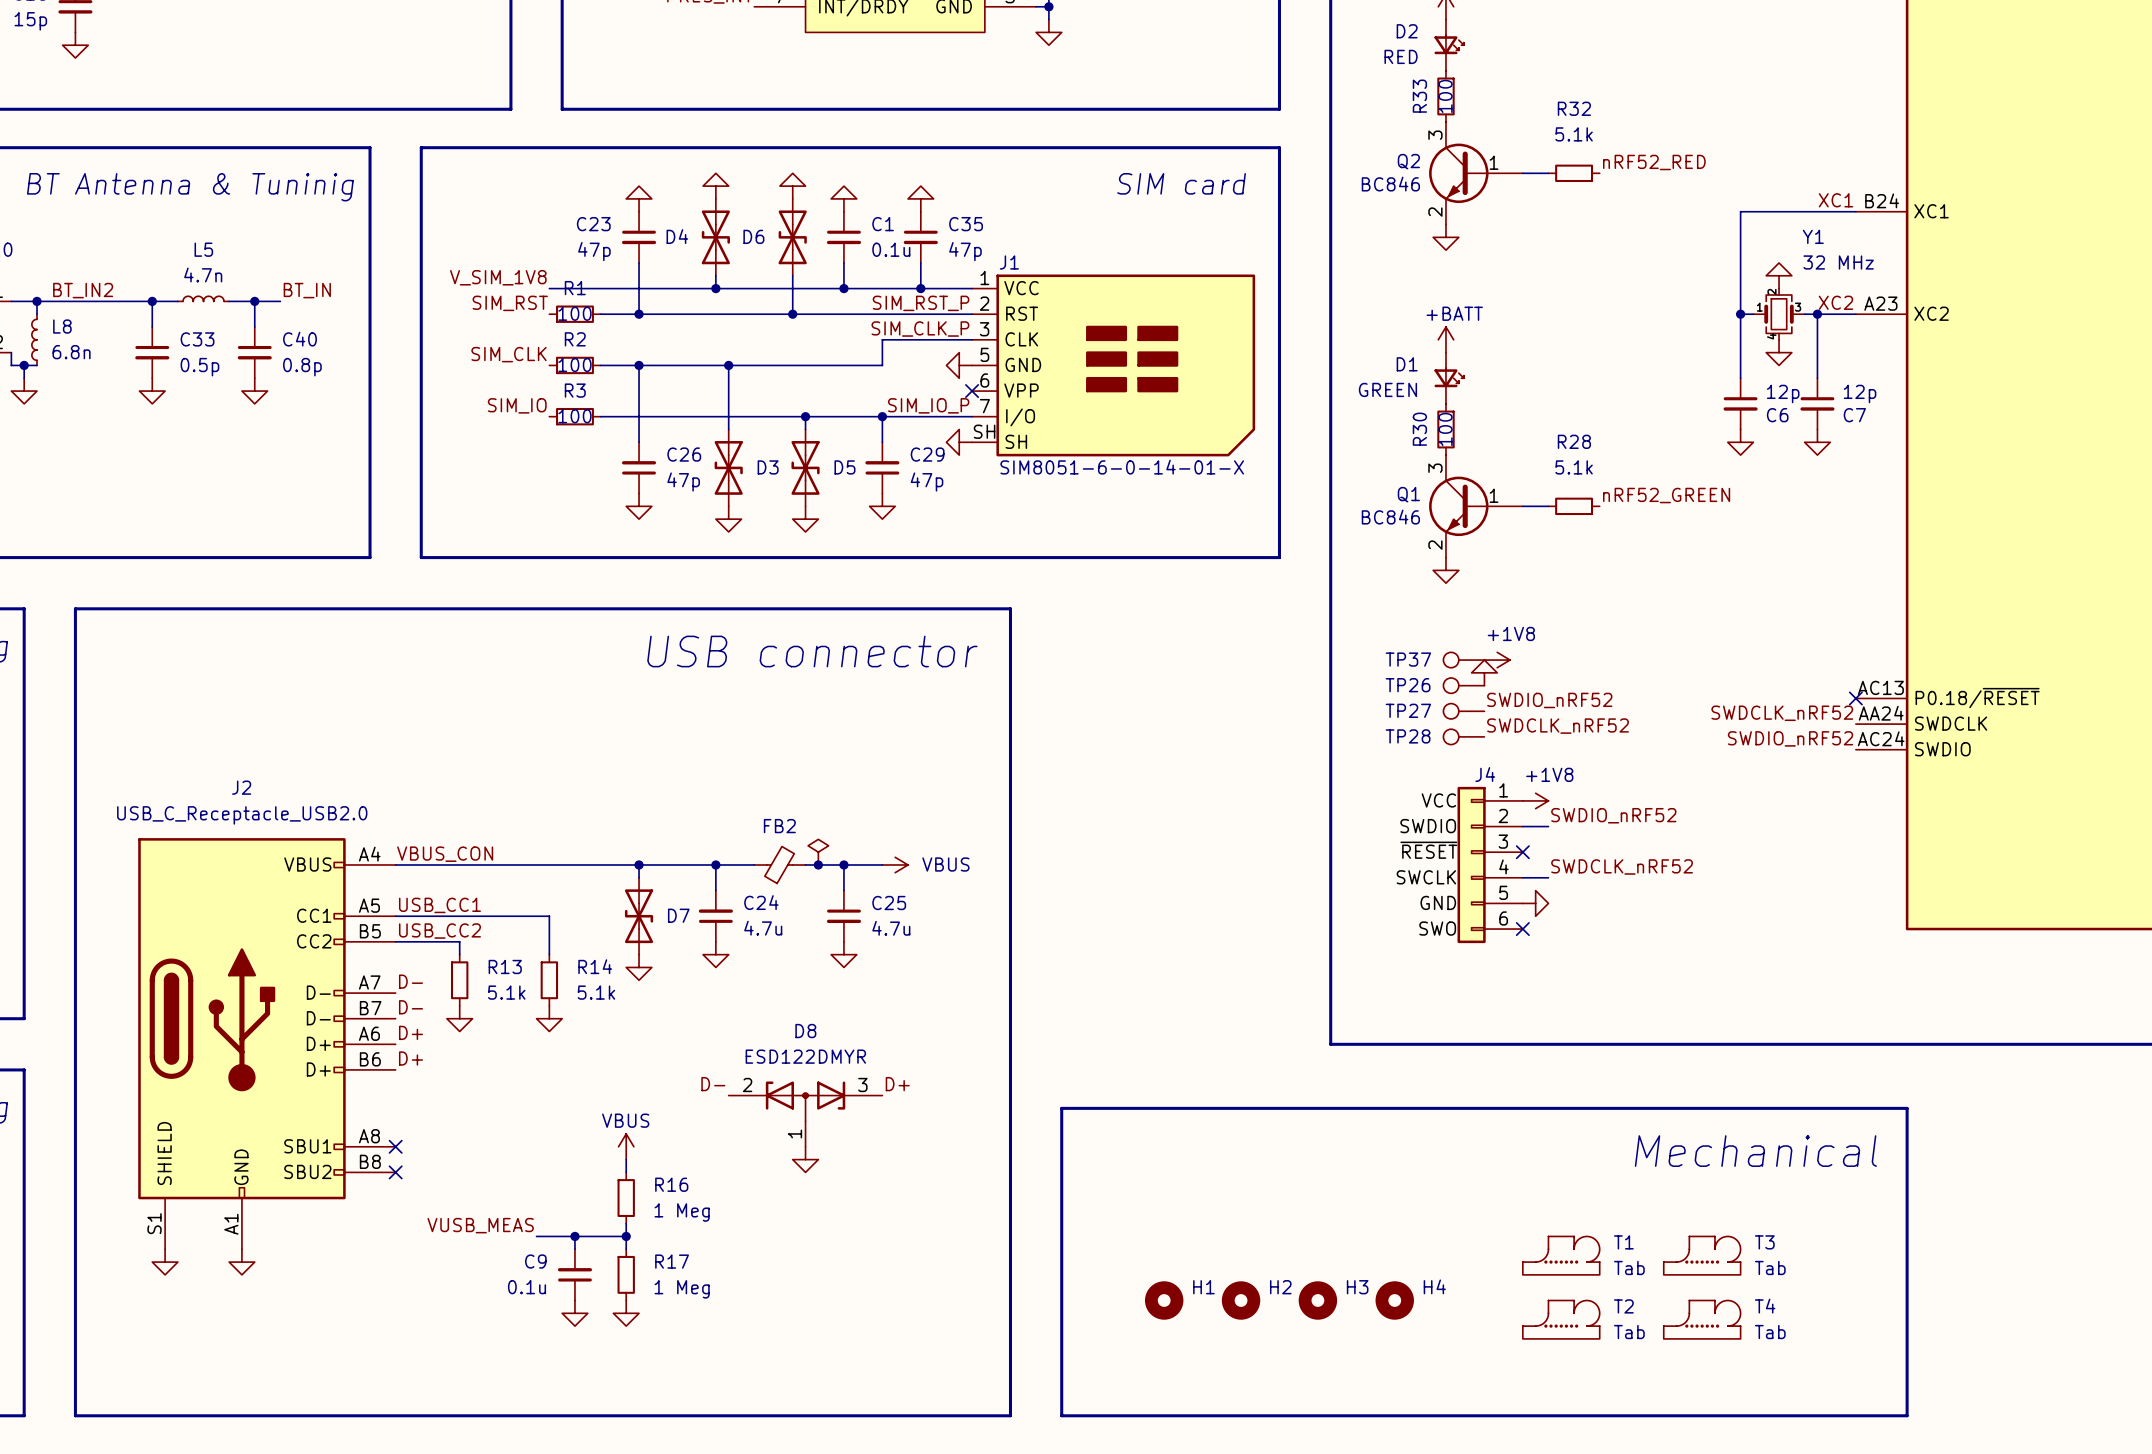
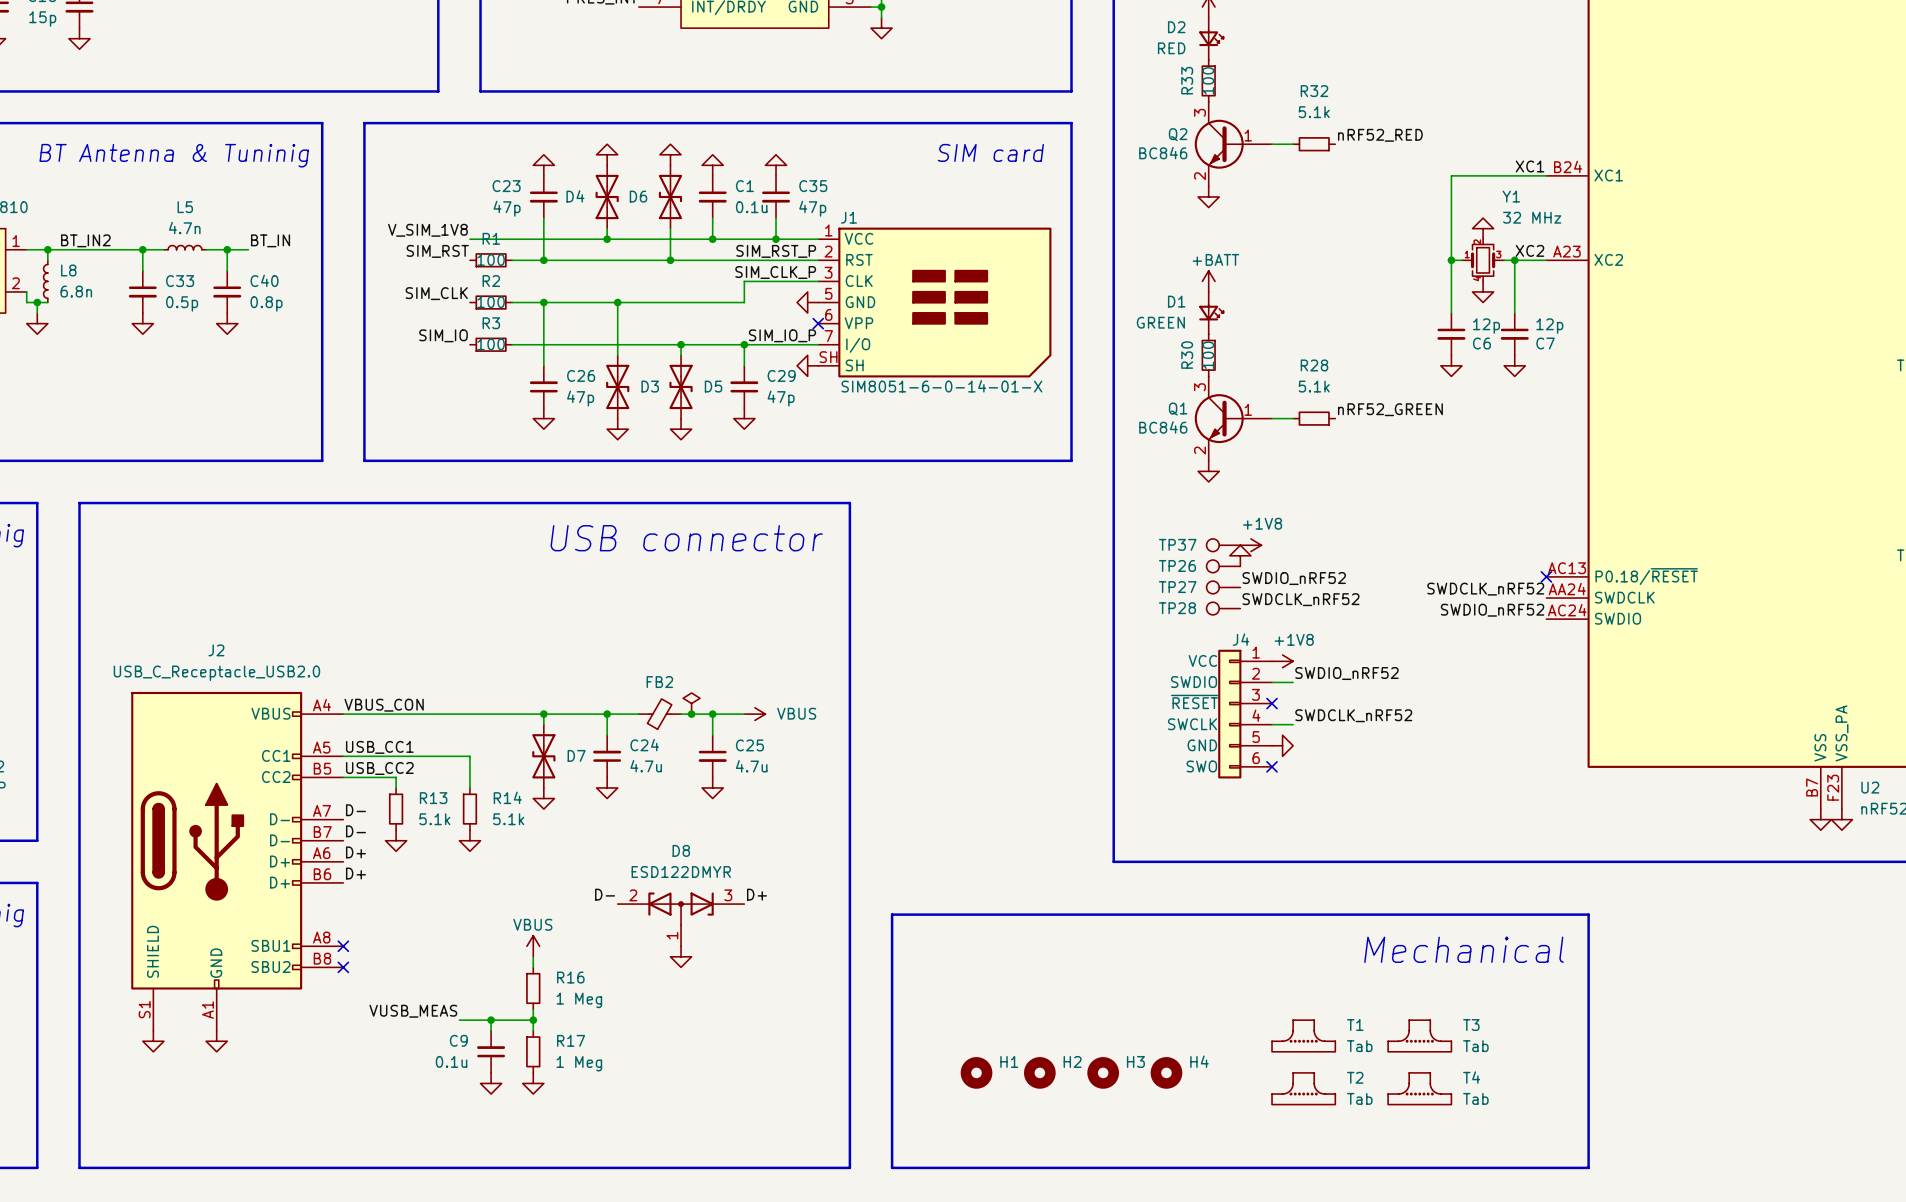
T1 symbol: [1522, 1235, 1601, 1276] -> [1271, 1019, 1336, 1053]
T3 symbol: [1662, 1235, 1742, 1276] -> [1387, 1019, 1453, 1053]
T2 symbol: [1522, 1299, 1601, 1340] -> [1271, 1072, 1336, 1106]
T4 symbol: [1662, 1299, 1742, 1340] -> [1387, 1072, 1453, 1106]

